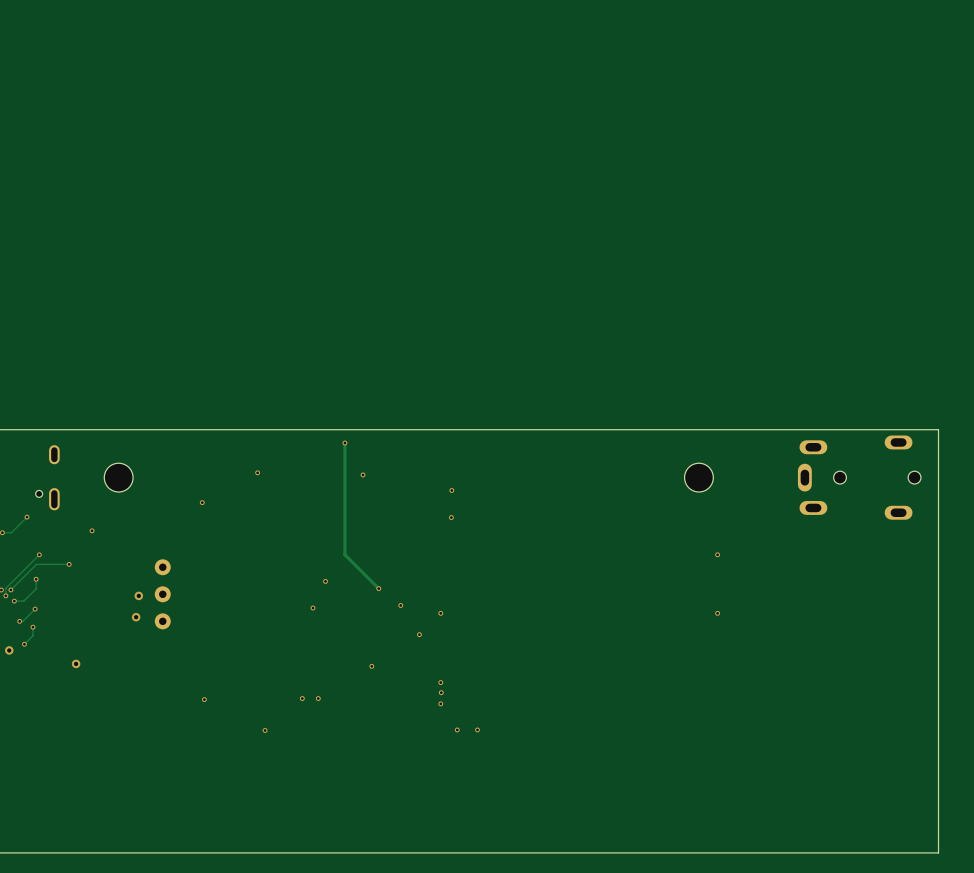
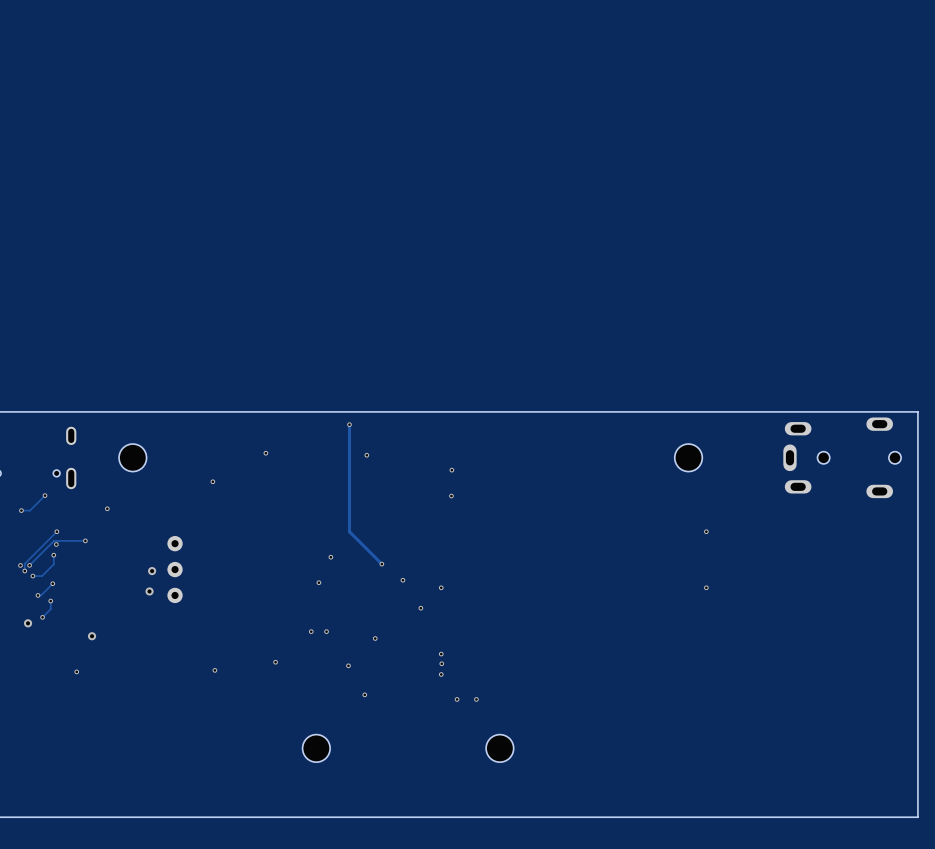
via: none -> (56, 544)
via: none -> (311, 631)
via: none -> (326, 631)
via: none -> (275, 662)
via: none -> (348, 665)
via: (302, 698) -> none
via: (318, 698) -> none
via: none -> (76, 671)
via: none -> (364, 694)
via: (265, 730) -> none
part: none -> (316, 748)
part: none -> (499, 748)

